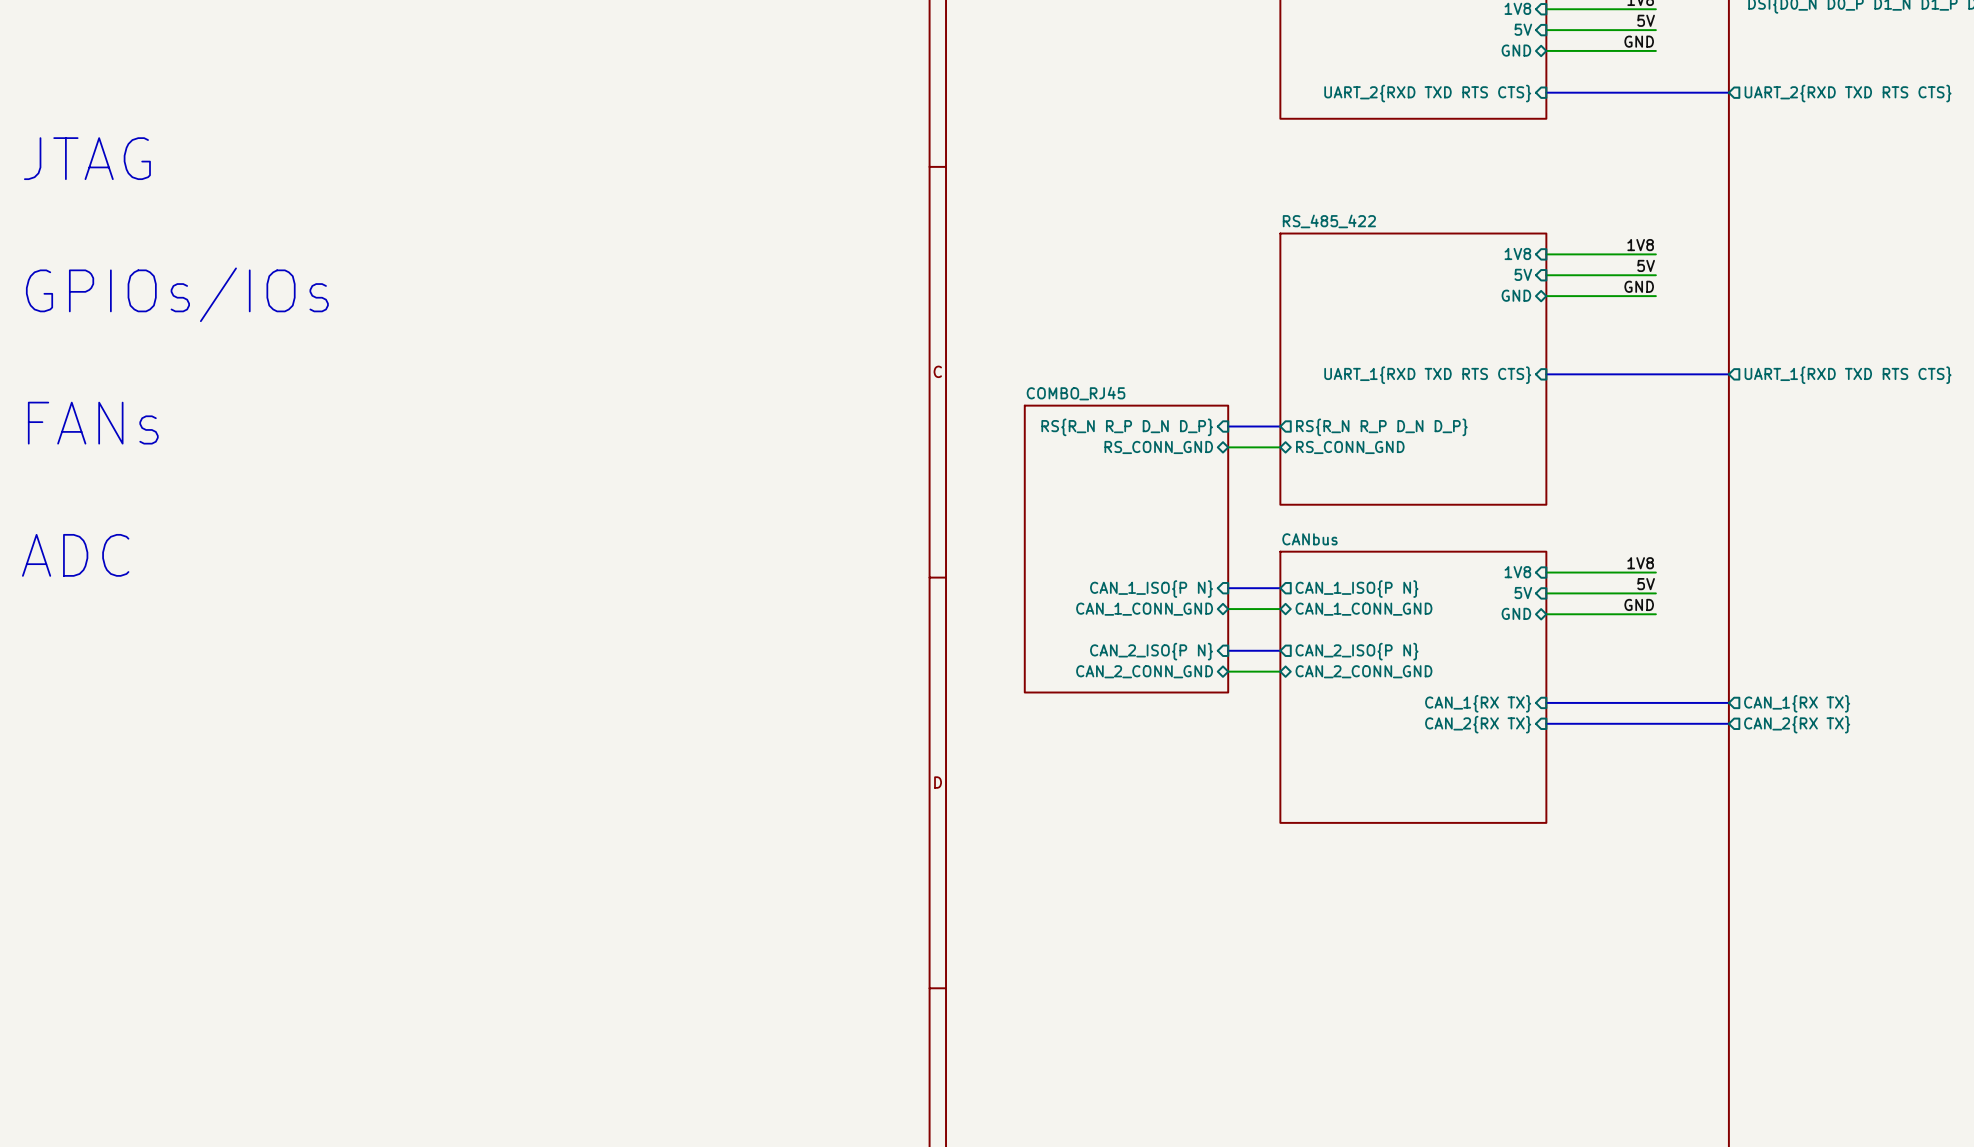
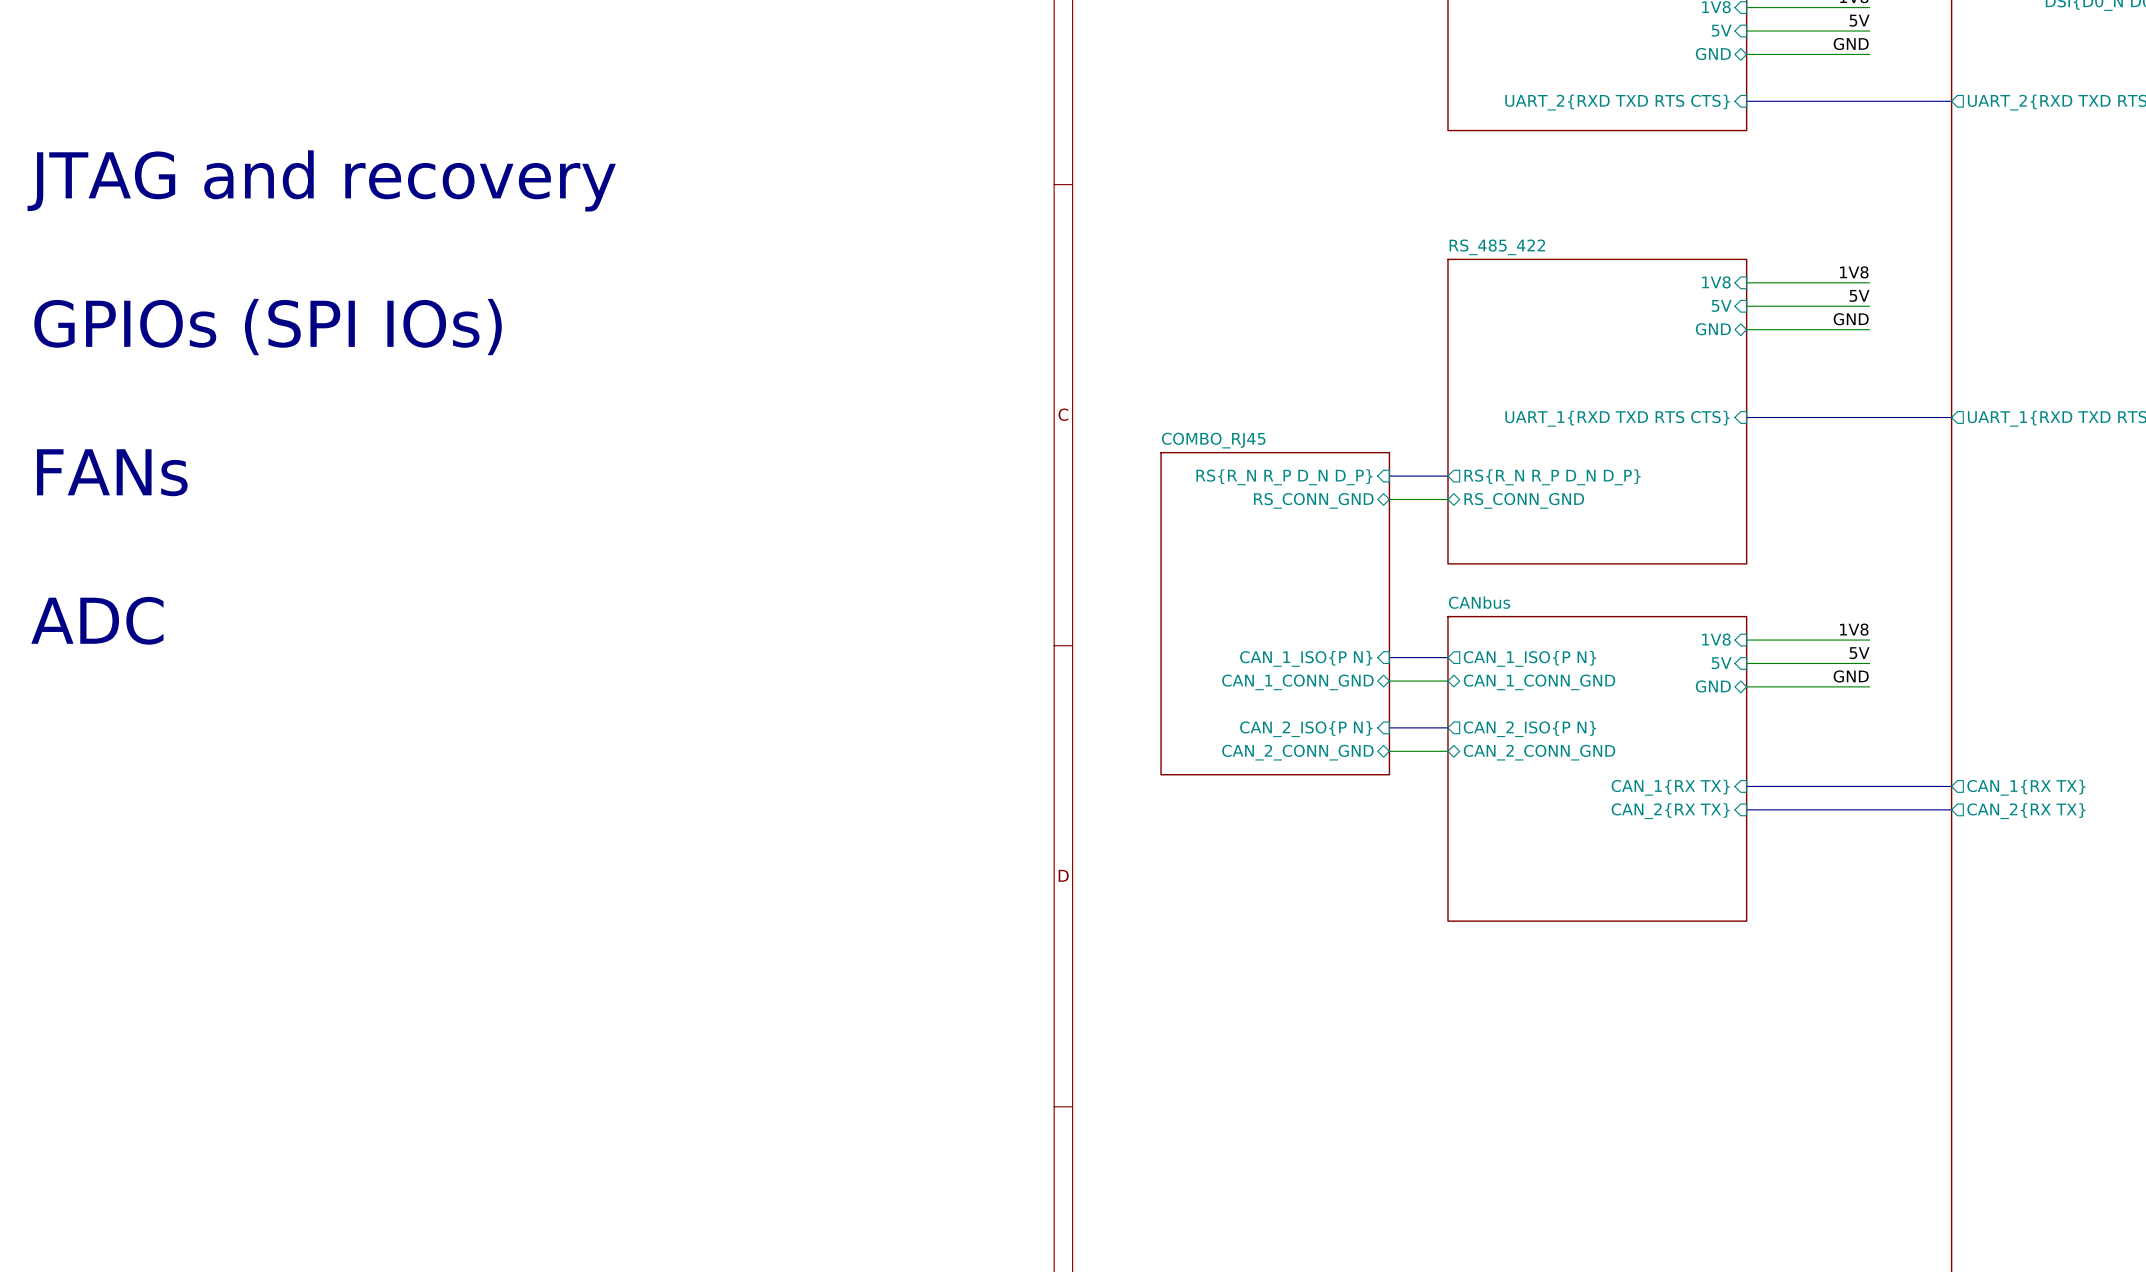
text: JTAG (87, 158) -> JTAG and recovery (321, 180)
text: GPIOs/IOs (177, 294) -> GPIOs (SPI IOs) (268, 327)

